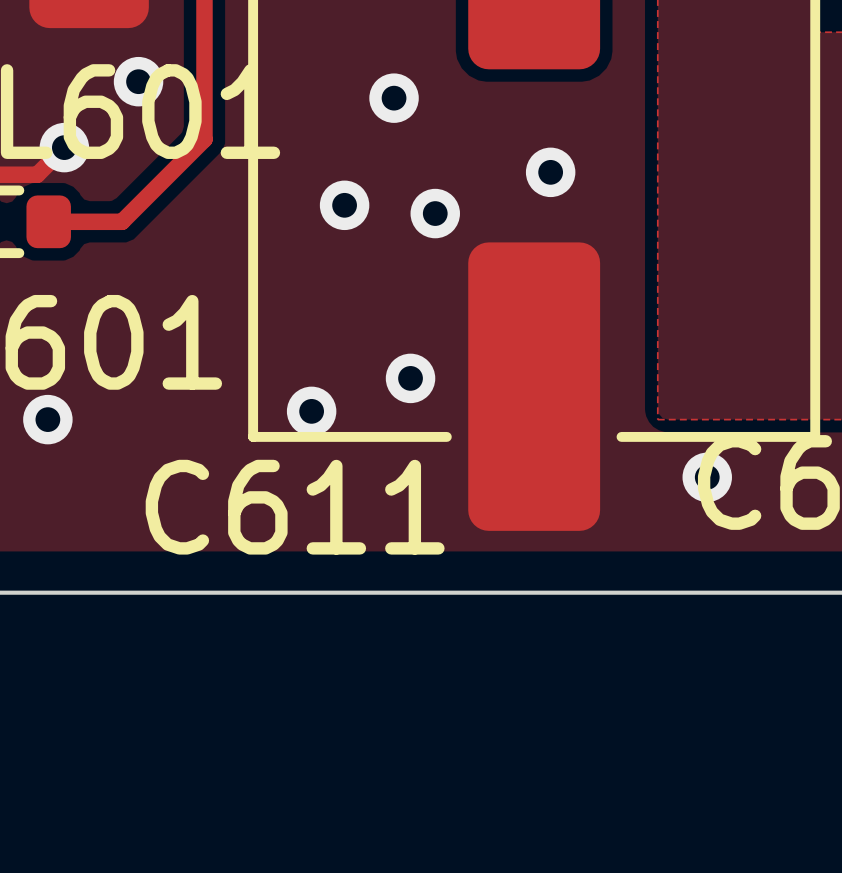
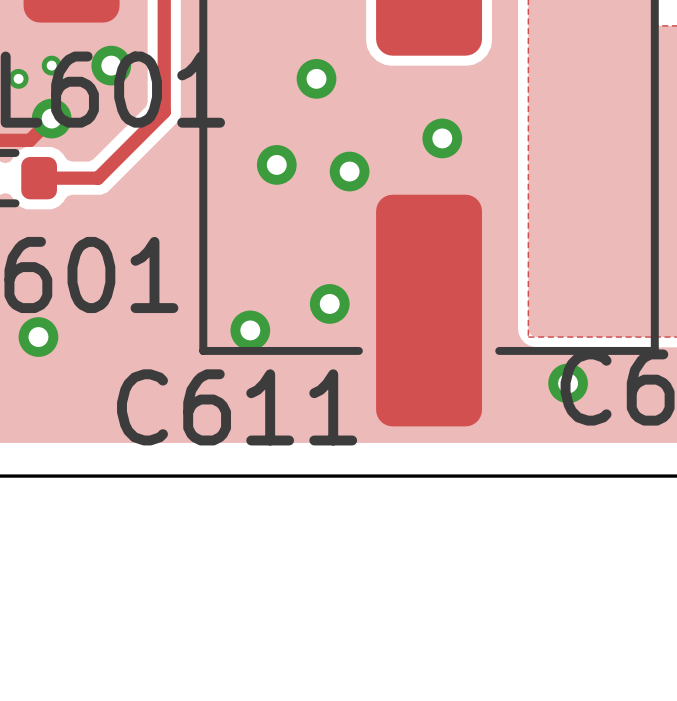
via: none -> (51, 65)
via: none -> (18, 78)

